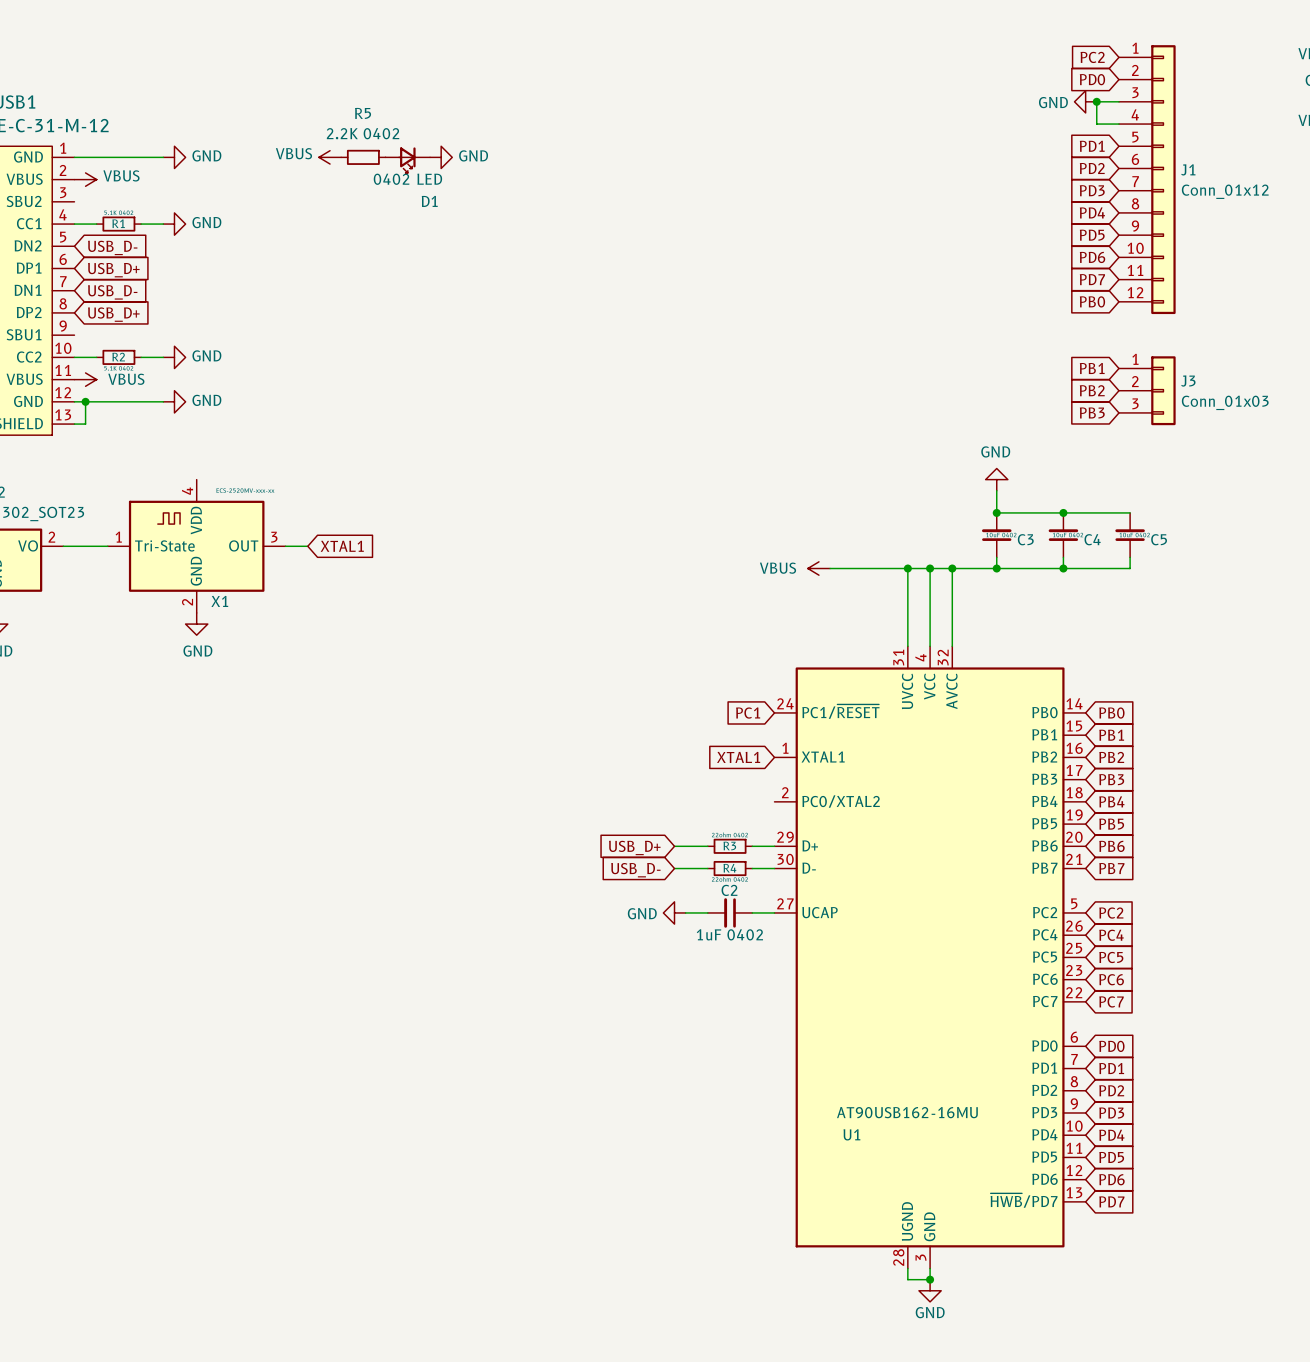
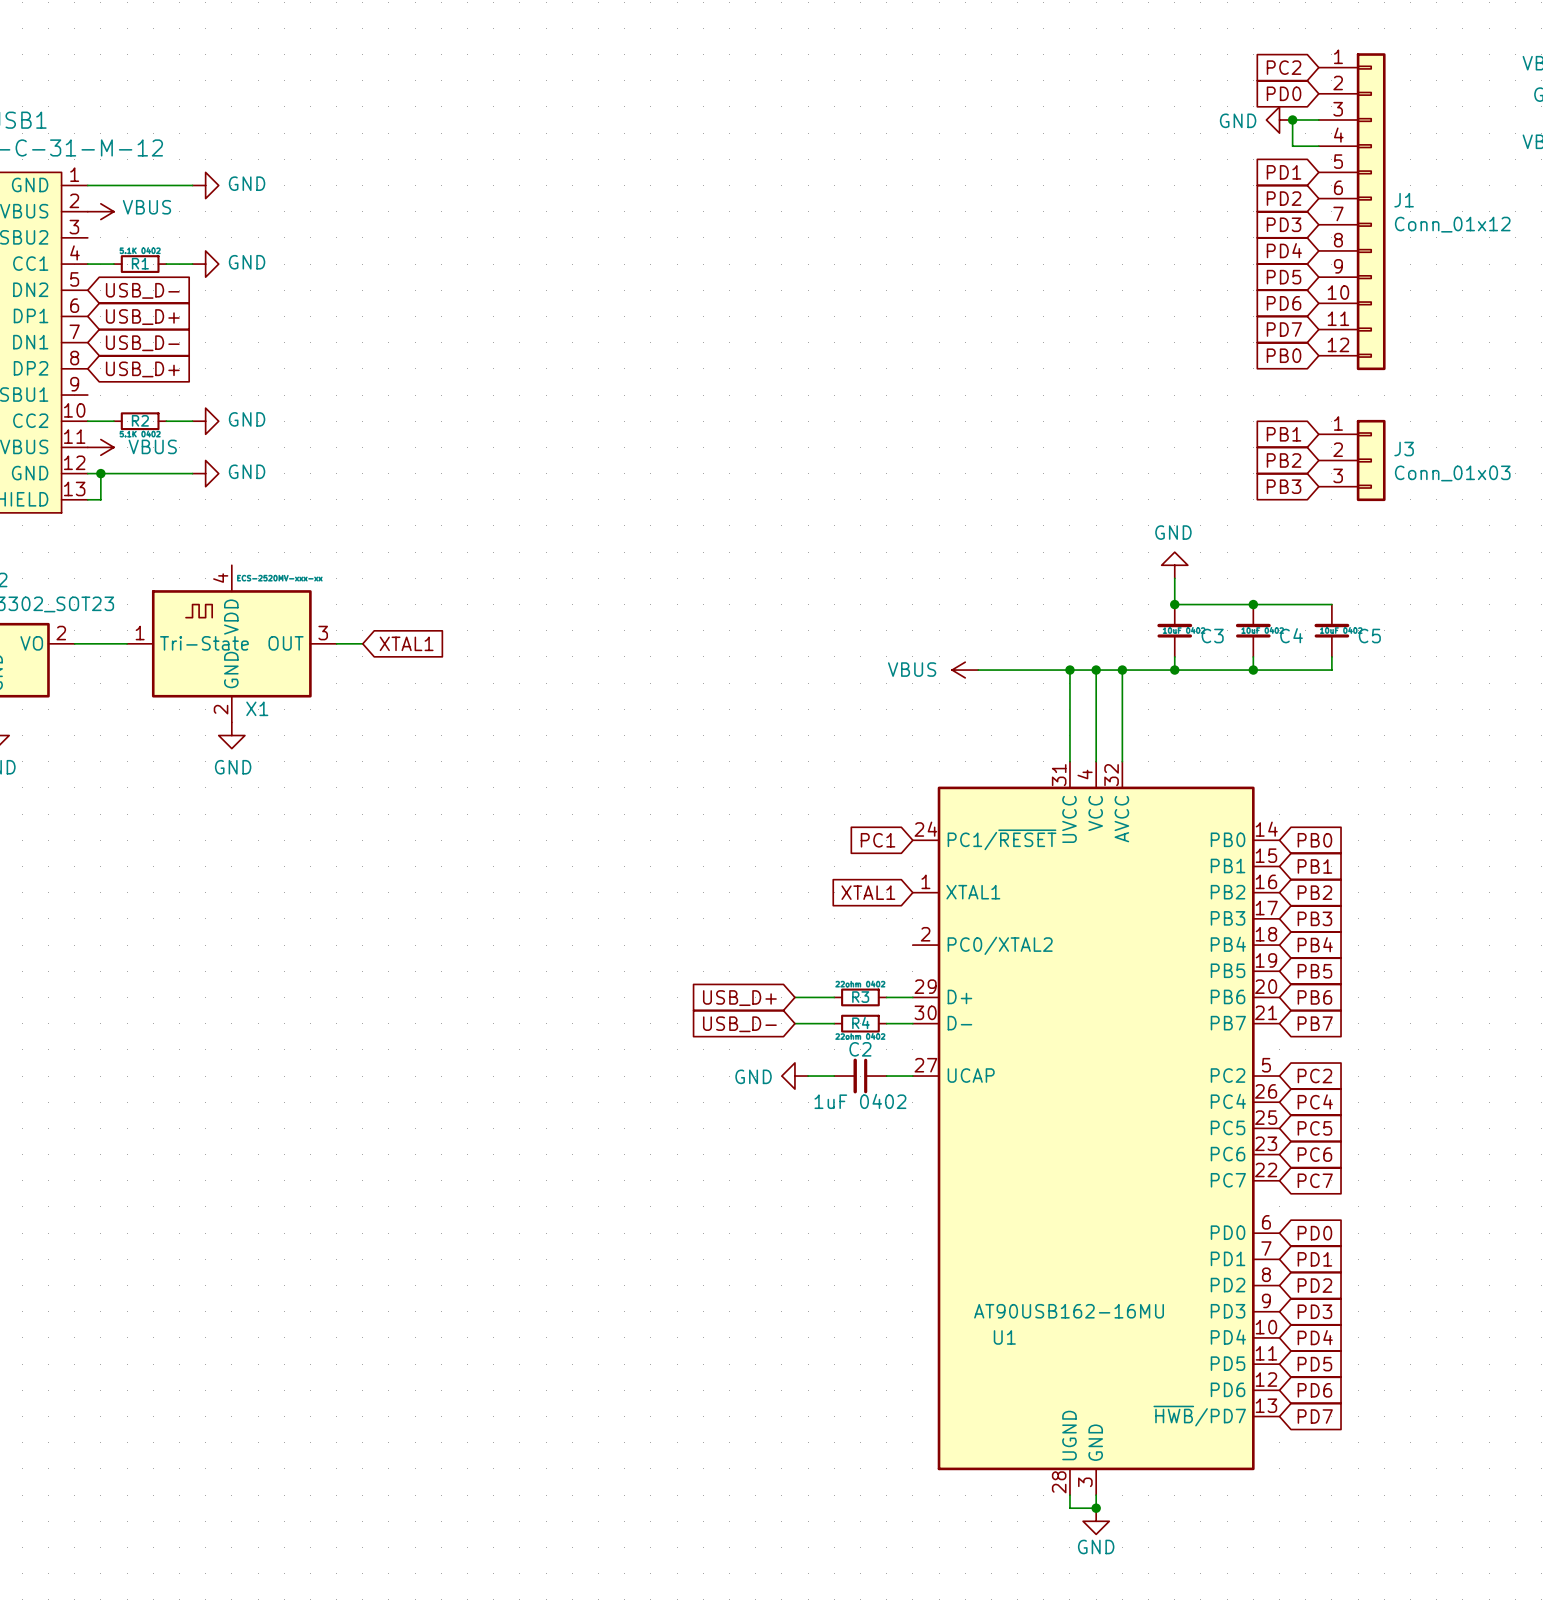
power symbol: VBUS (330, 157) -> none
R5: 2.2K 0402 (363, 157) -> none
power symbol: GND (441, 157) -> none
D1: 0402 LED (407, 160) -> none

